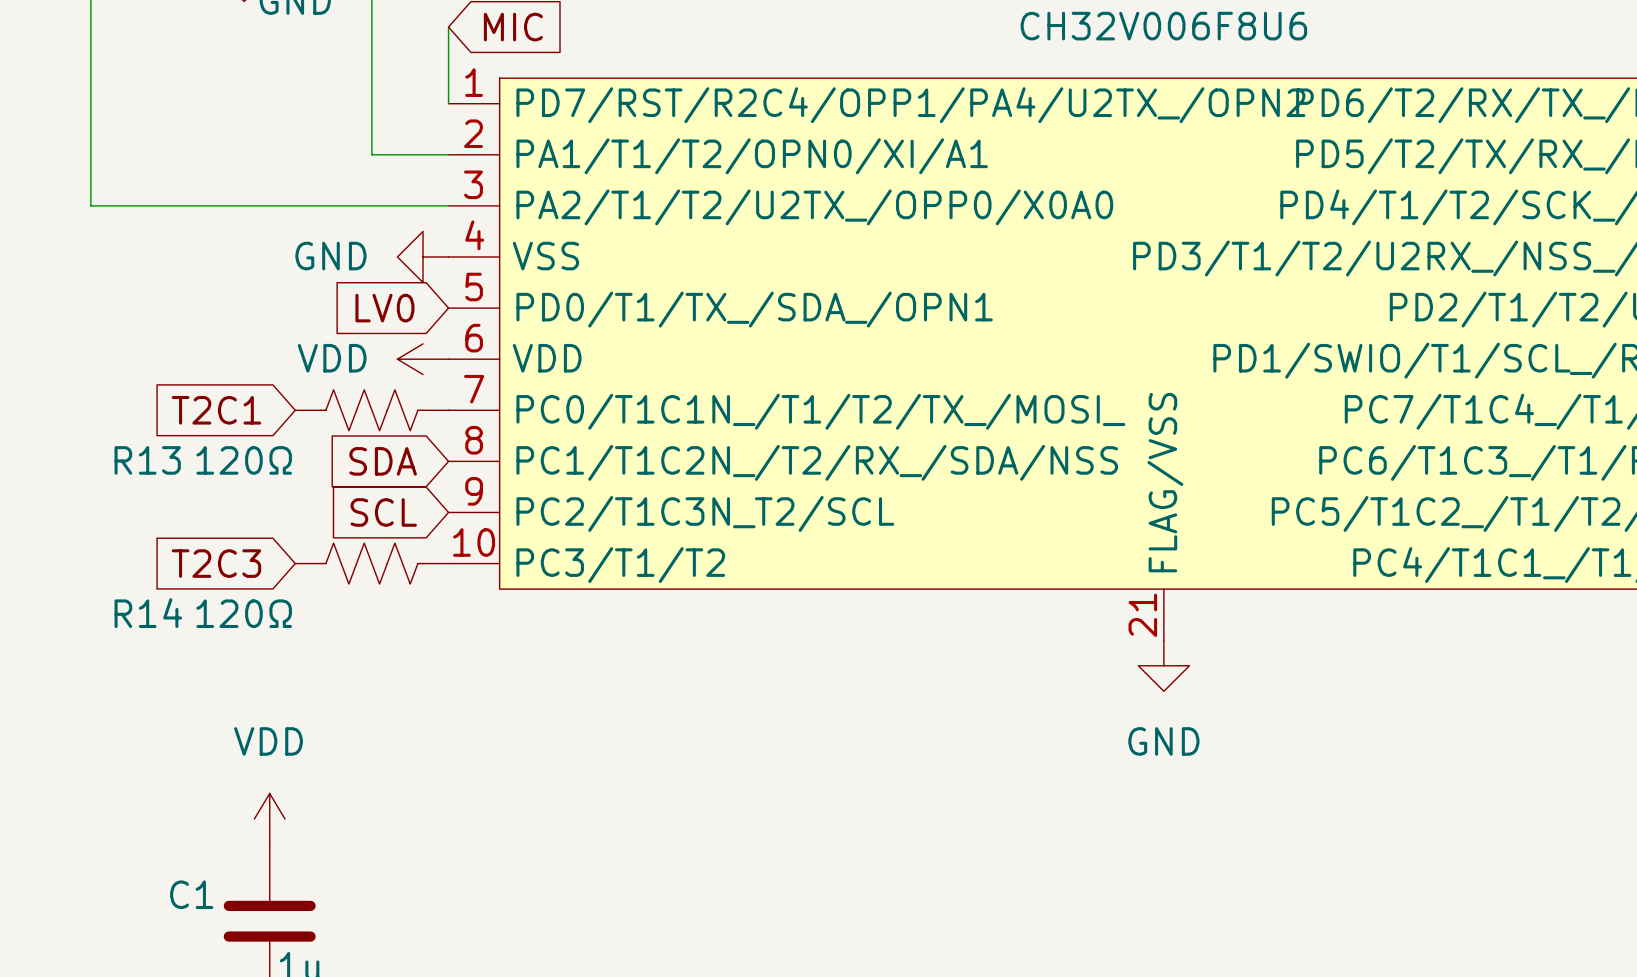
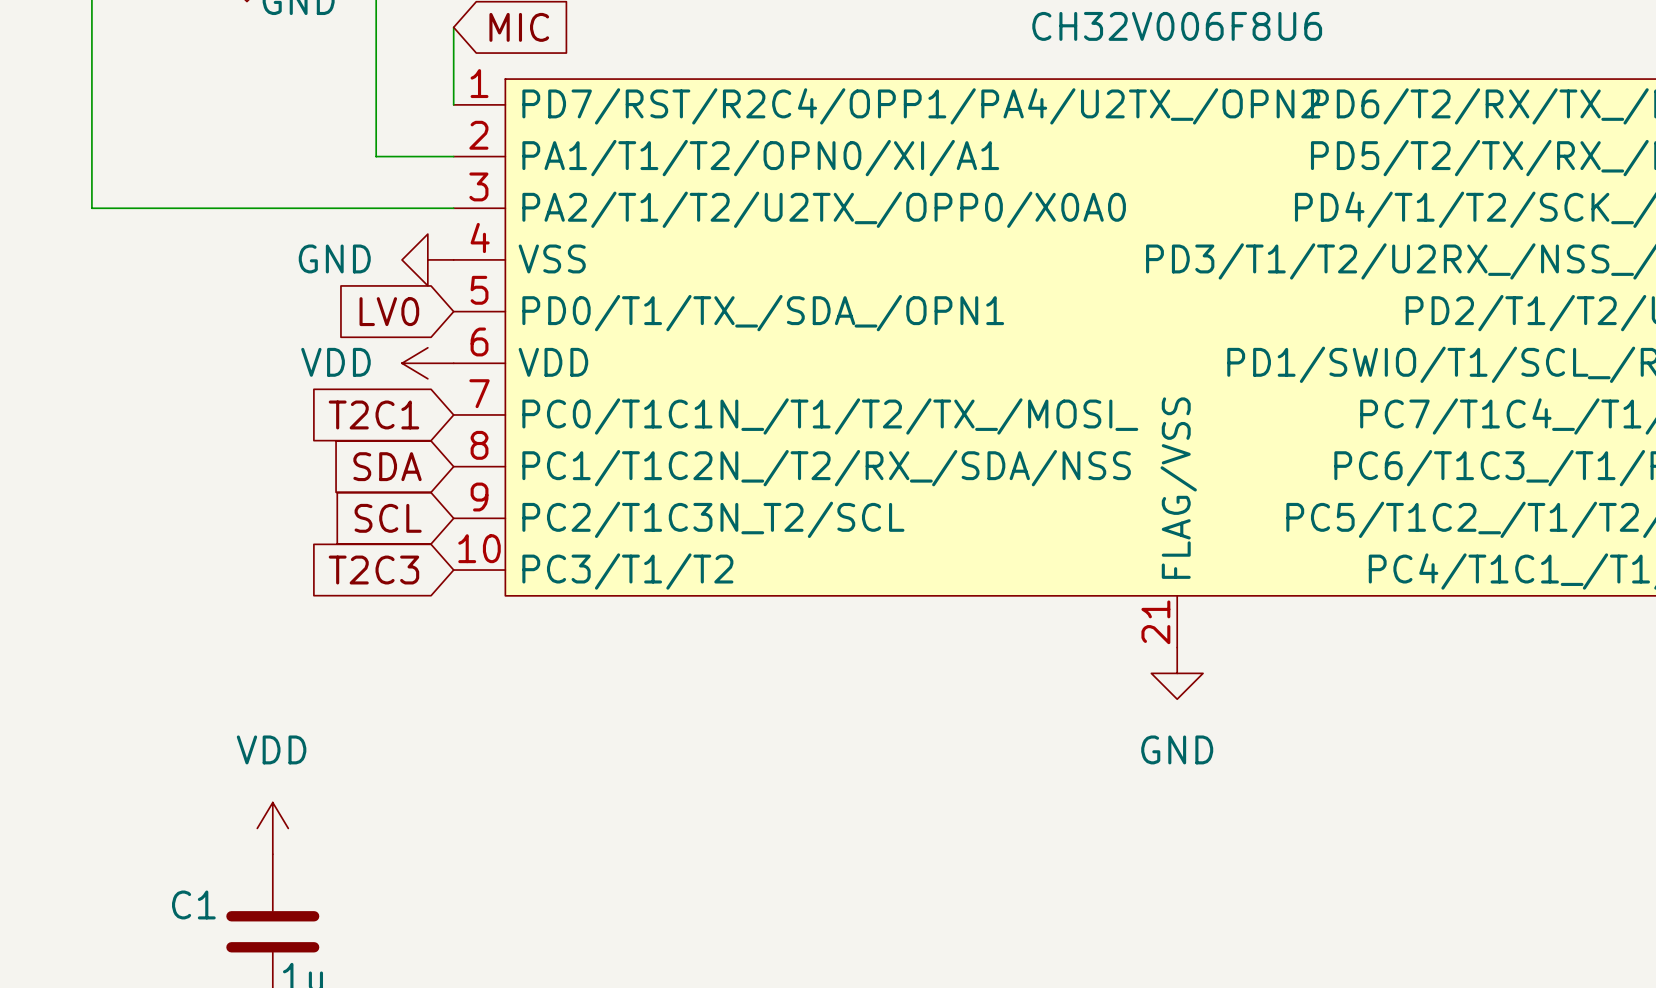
global label position: T2C1 (216, 410) -> T2C1 (373, 414)
R13: 120Ω (371, 410) -> none
global label position: T2C3 (216, 563) -> T2C3 (373, 570)
R14: 120Ω (371, 563) -> none

